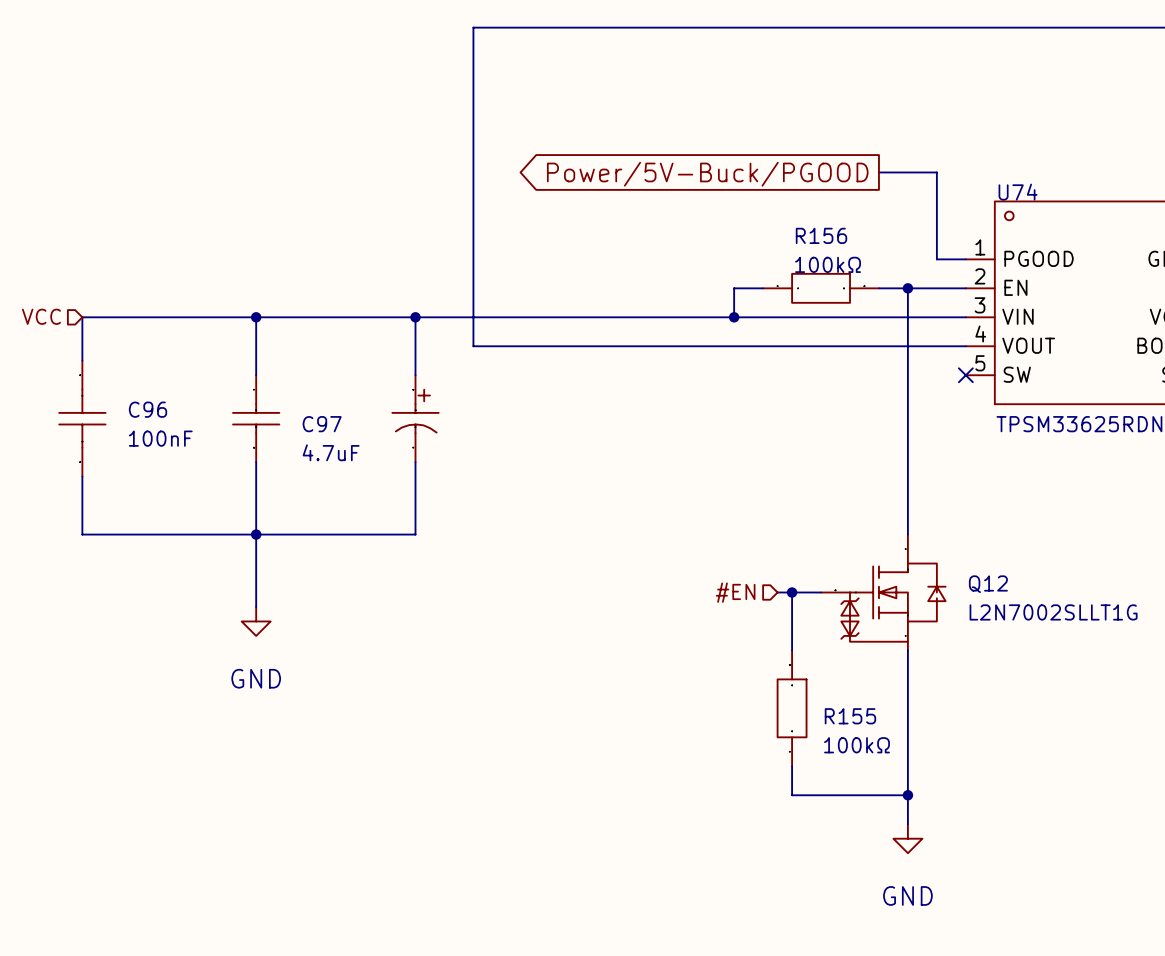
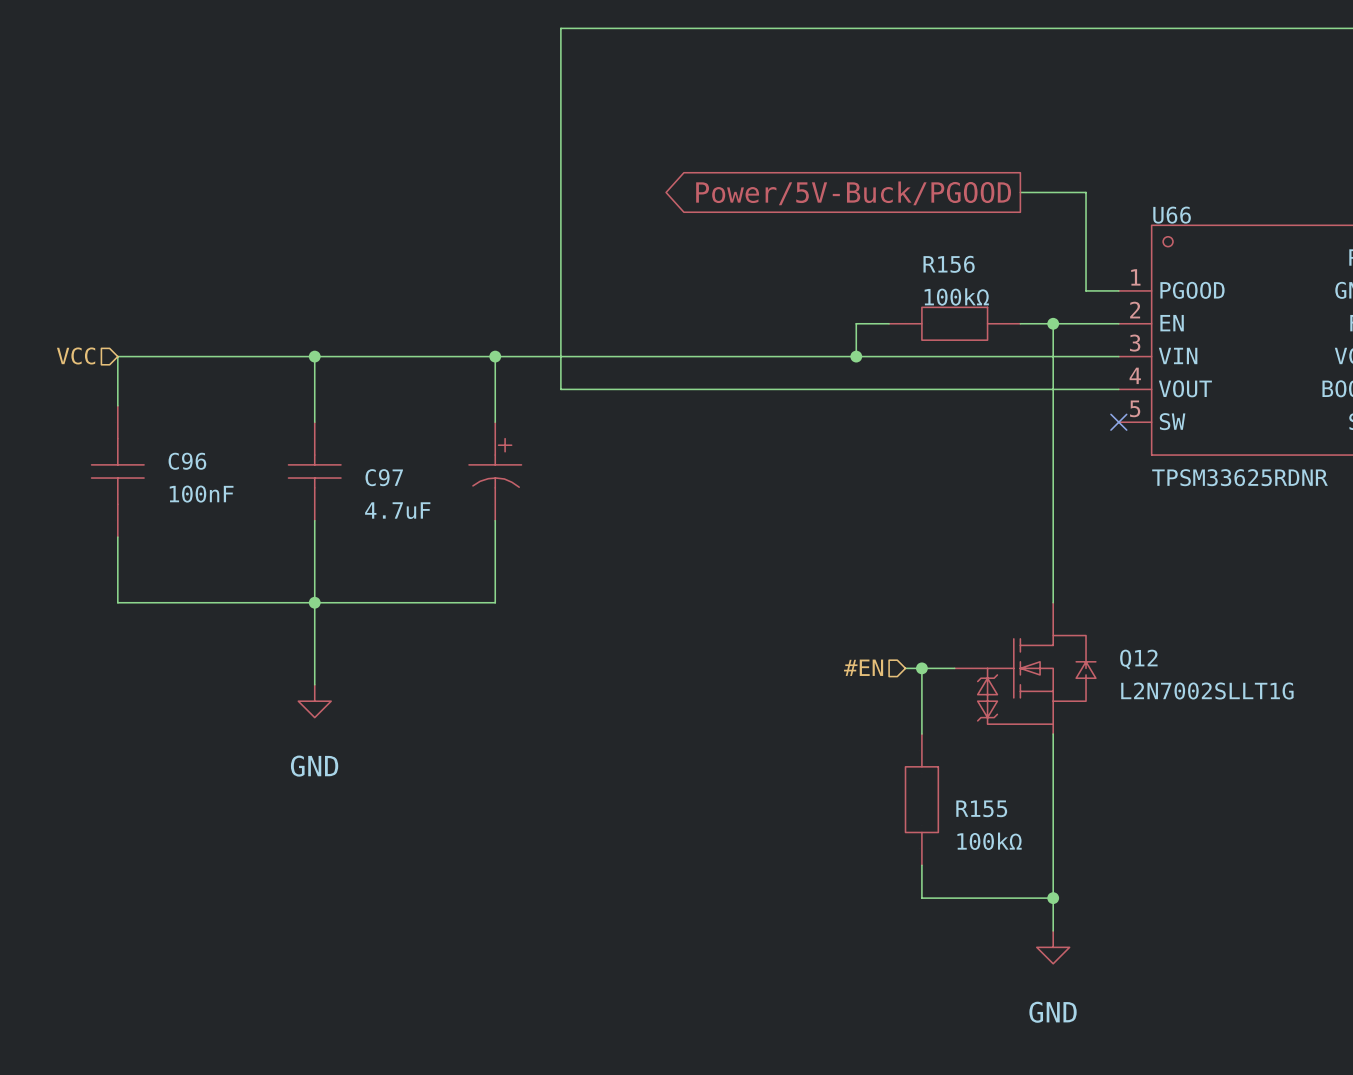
U74 name: U74 (1018, 192) -> U66 (1172, 215)

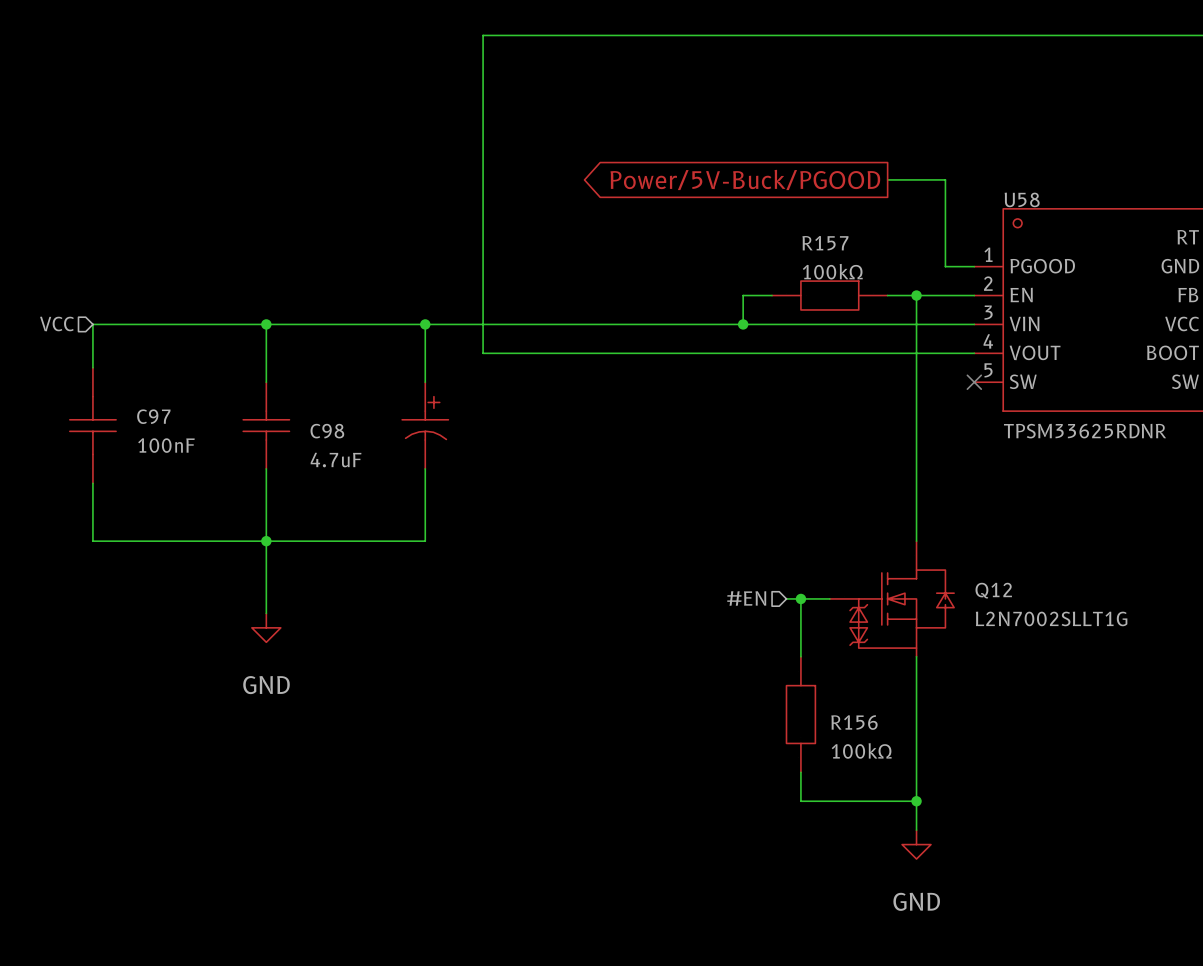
U66 name: U66 (1172, 215) -> U58 (1022, 199)
R156 name: R156 (949, 264) -> R157 (825, 243)
C96 name: C96 (187, 461) -> C97 (153, 416)
C97 name: C97 (384, 477) -> C98 (327, 431)
R155 name: R155 (981, 808) -> R156 (854, 722)

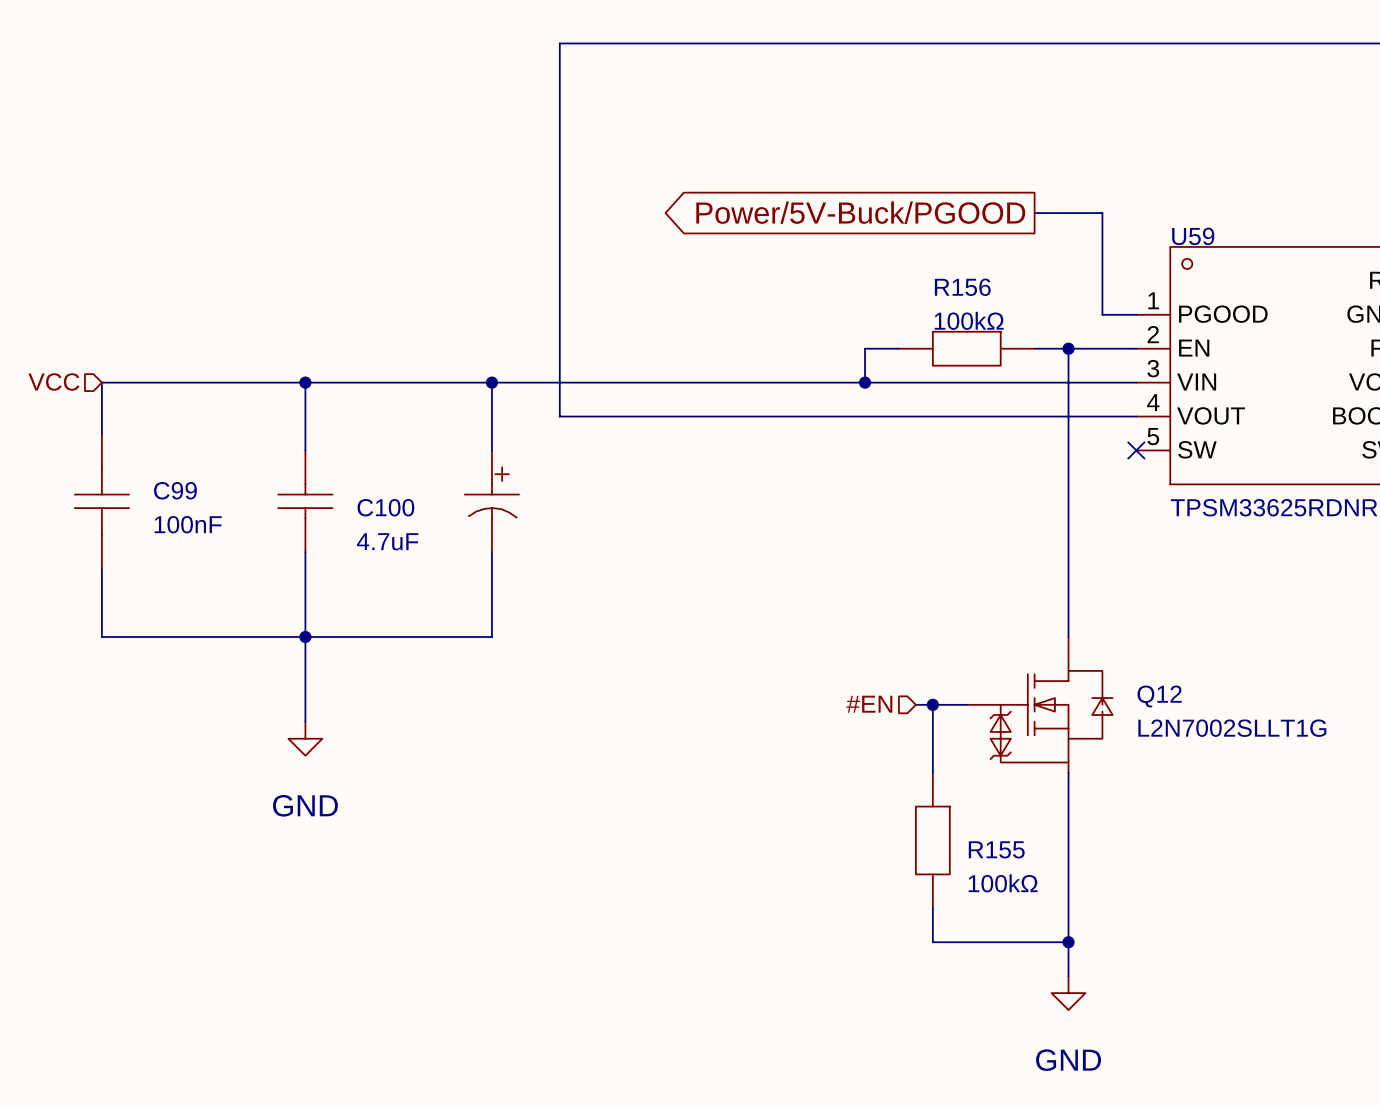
U58 name: U58 (1022, 199) -> U59 (1193, 236)
R157 name: R157 (825, 243) -> R156 (962, 287)
C97 name: C97 (153, 416) -> C99 (175, 490)
C98 name: C98 (327, 431) -> C100 (385, 507)
R156 name: R156 (854, 722) -> R155 (996, 849)

